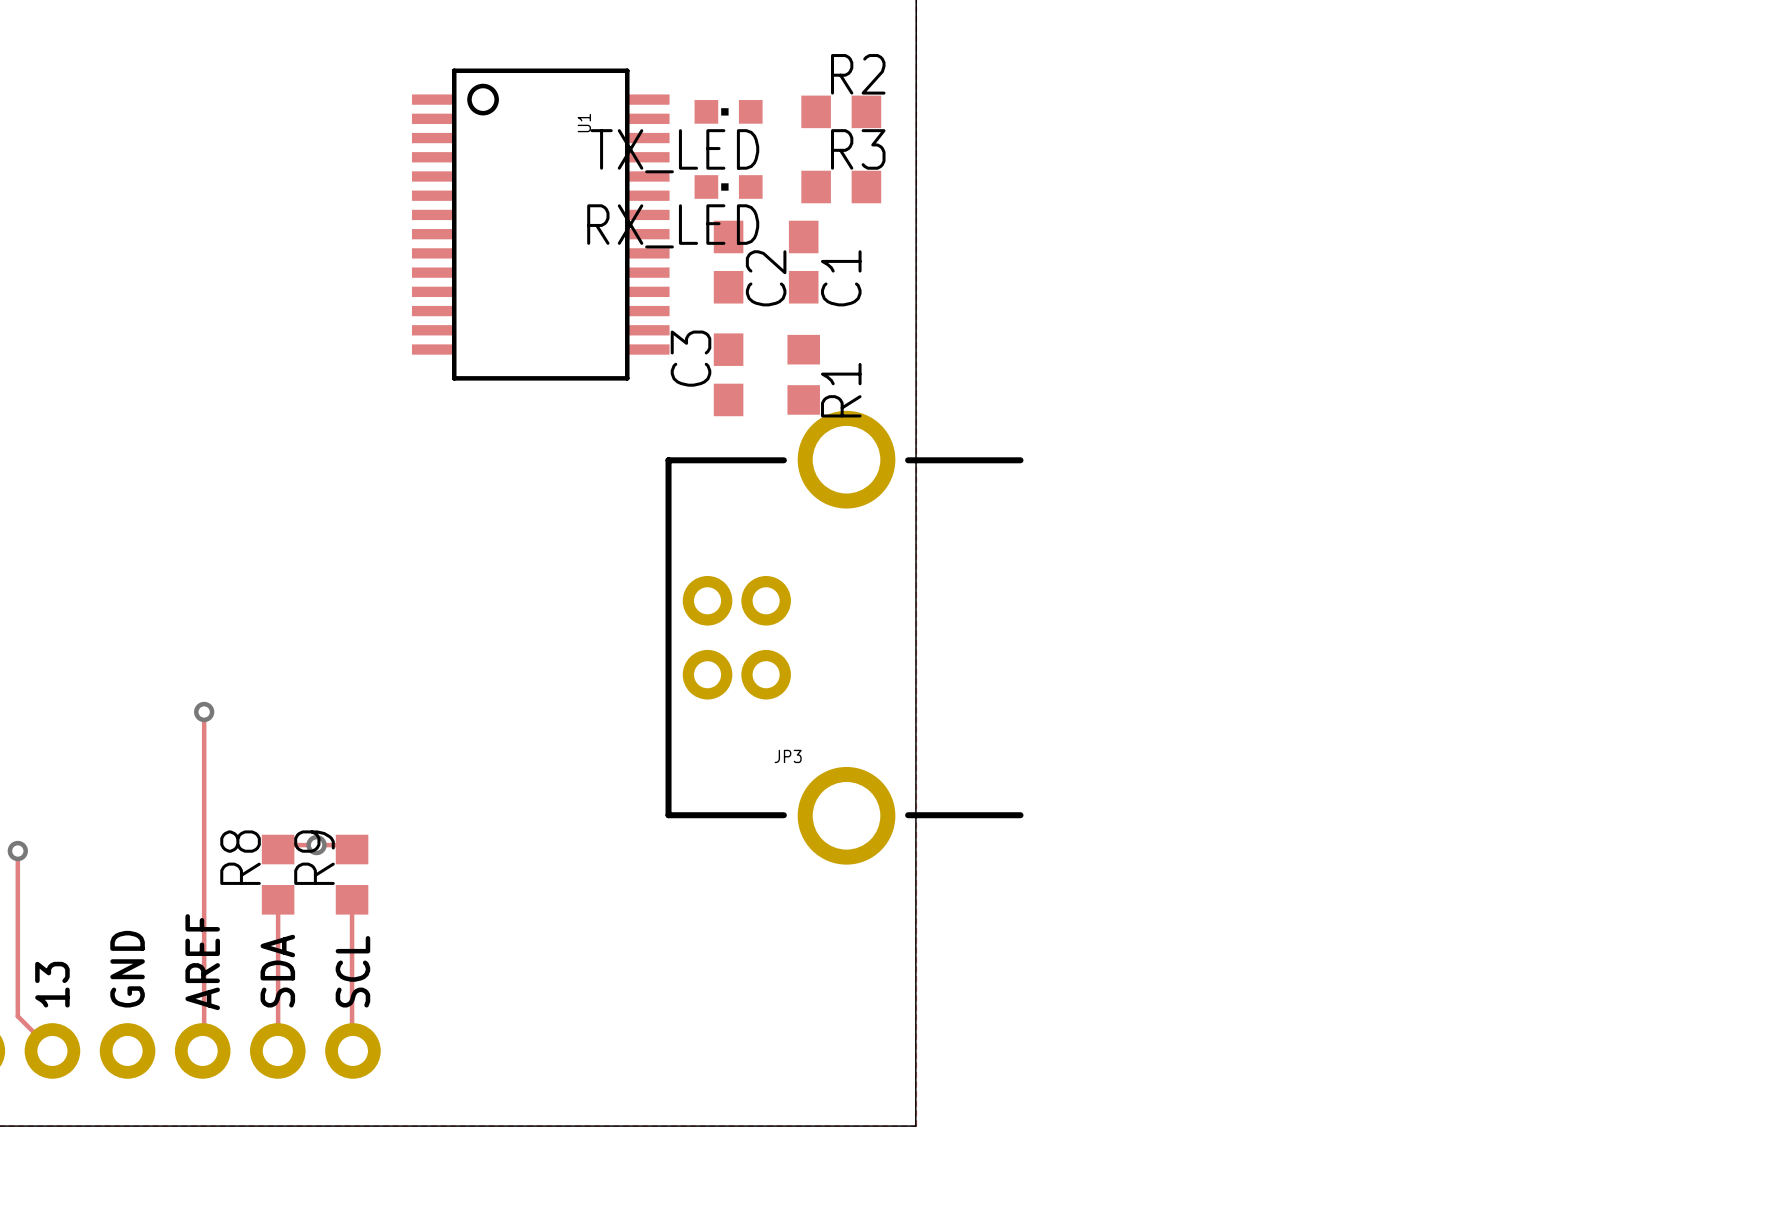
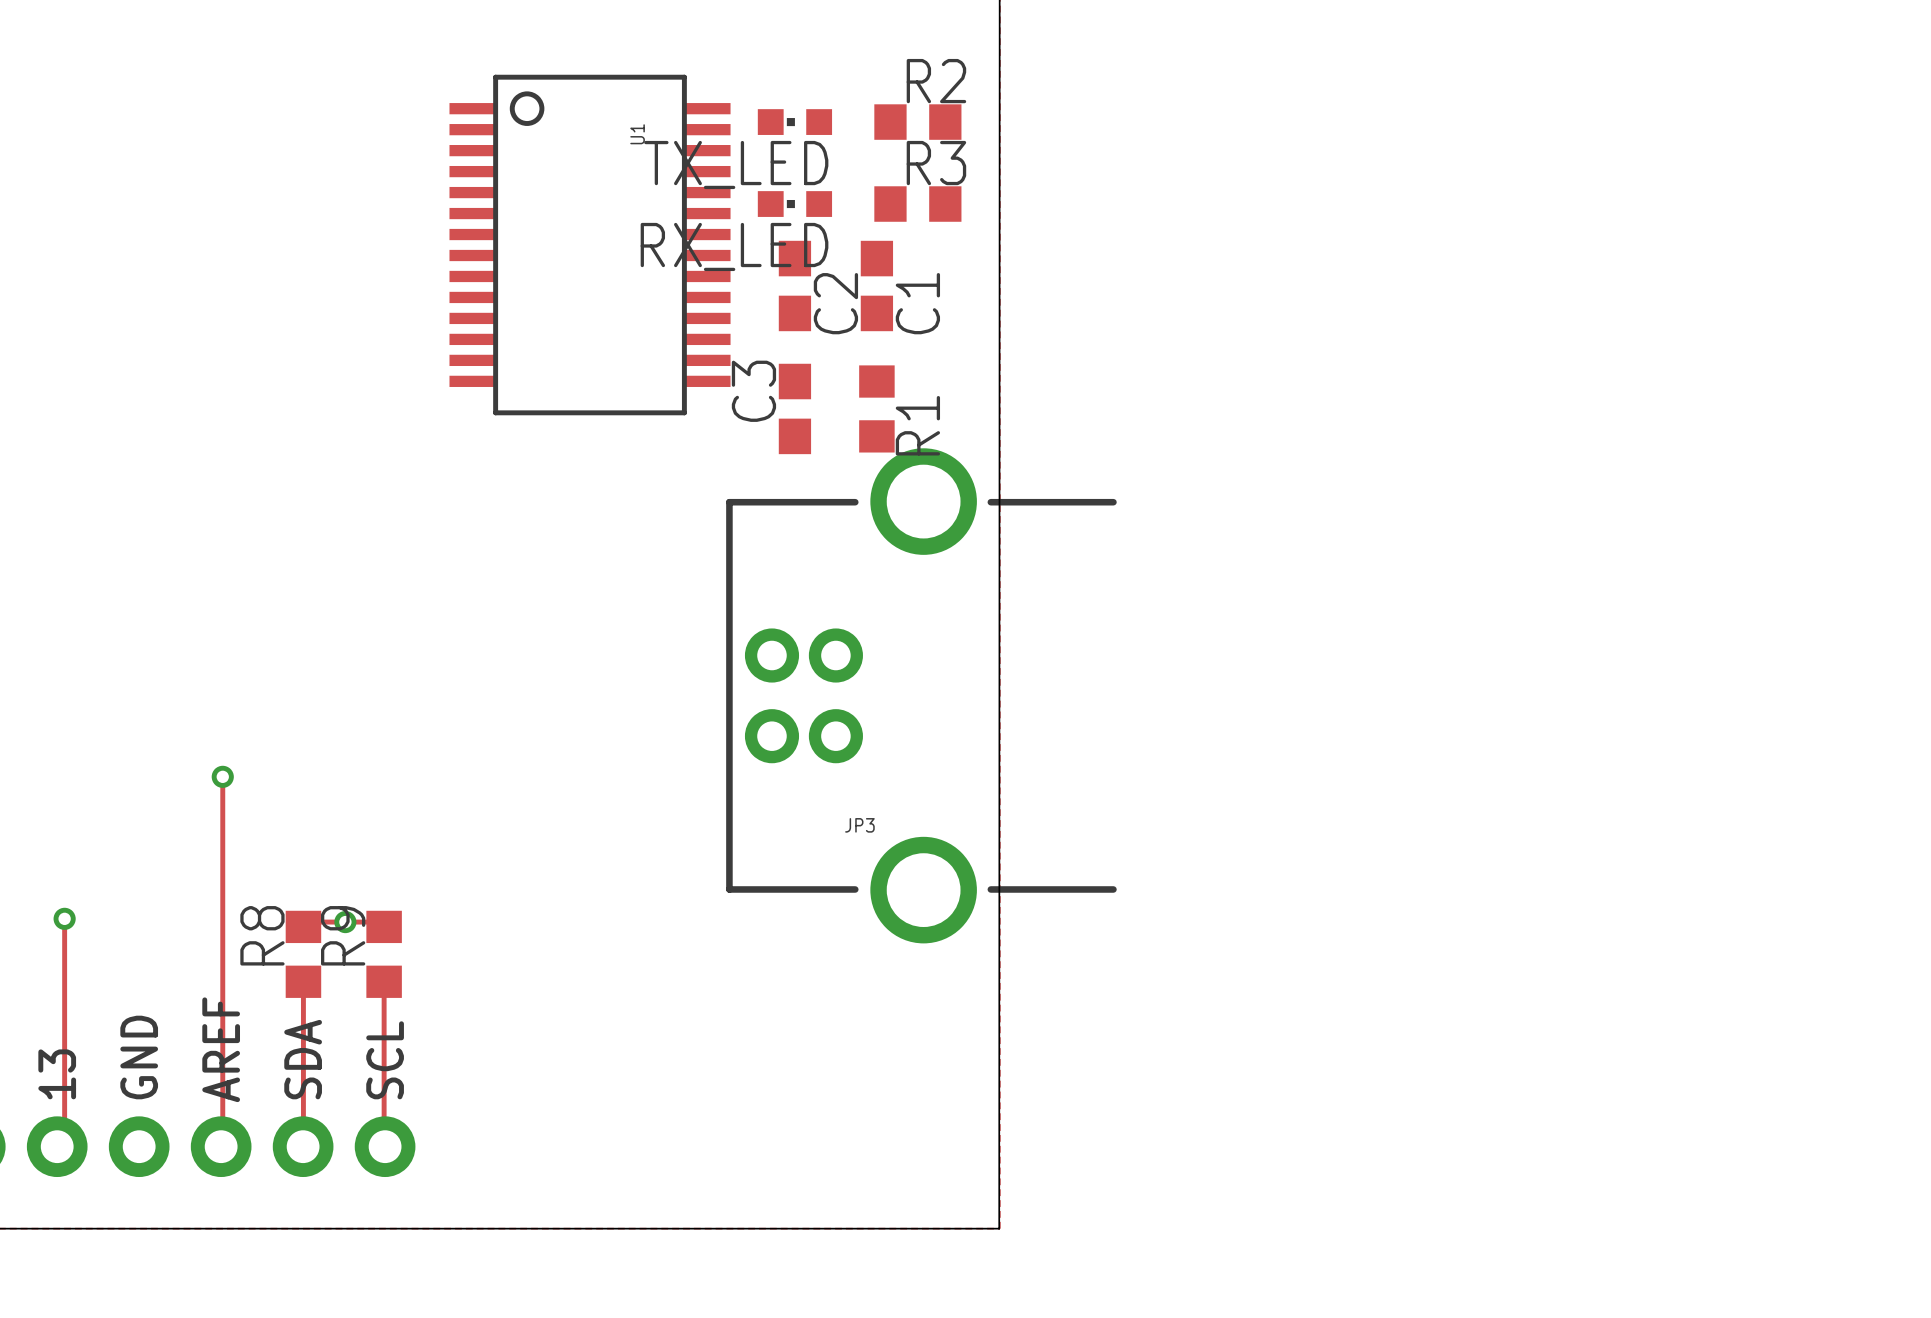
via: none -> (64, 918)
track: (17, 851) (17, 1016) (52, 1050) -> (64, 918) (64, 1139) (57, 1146)
via: (17, 851) -> none

